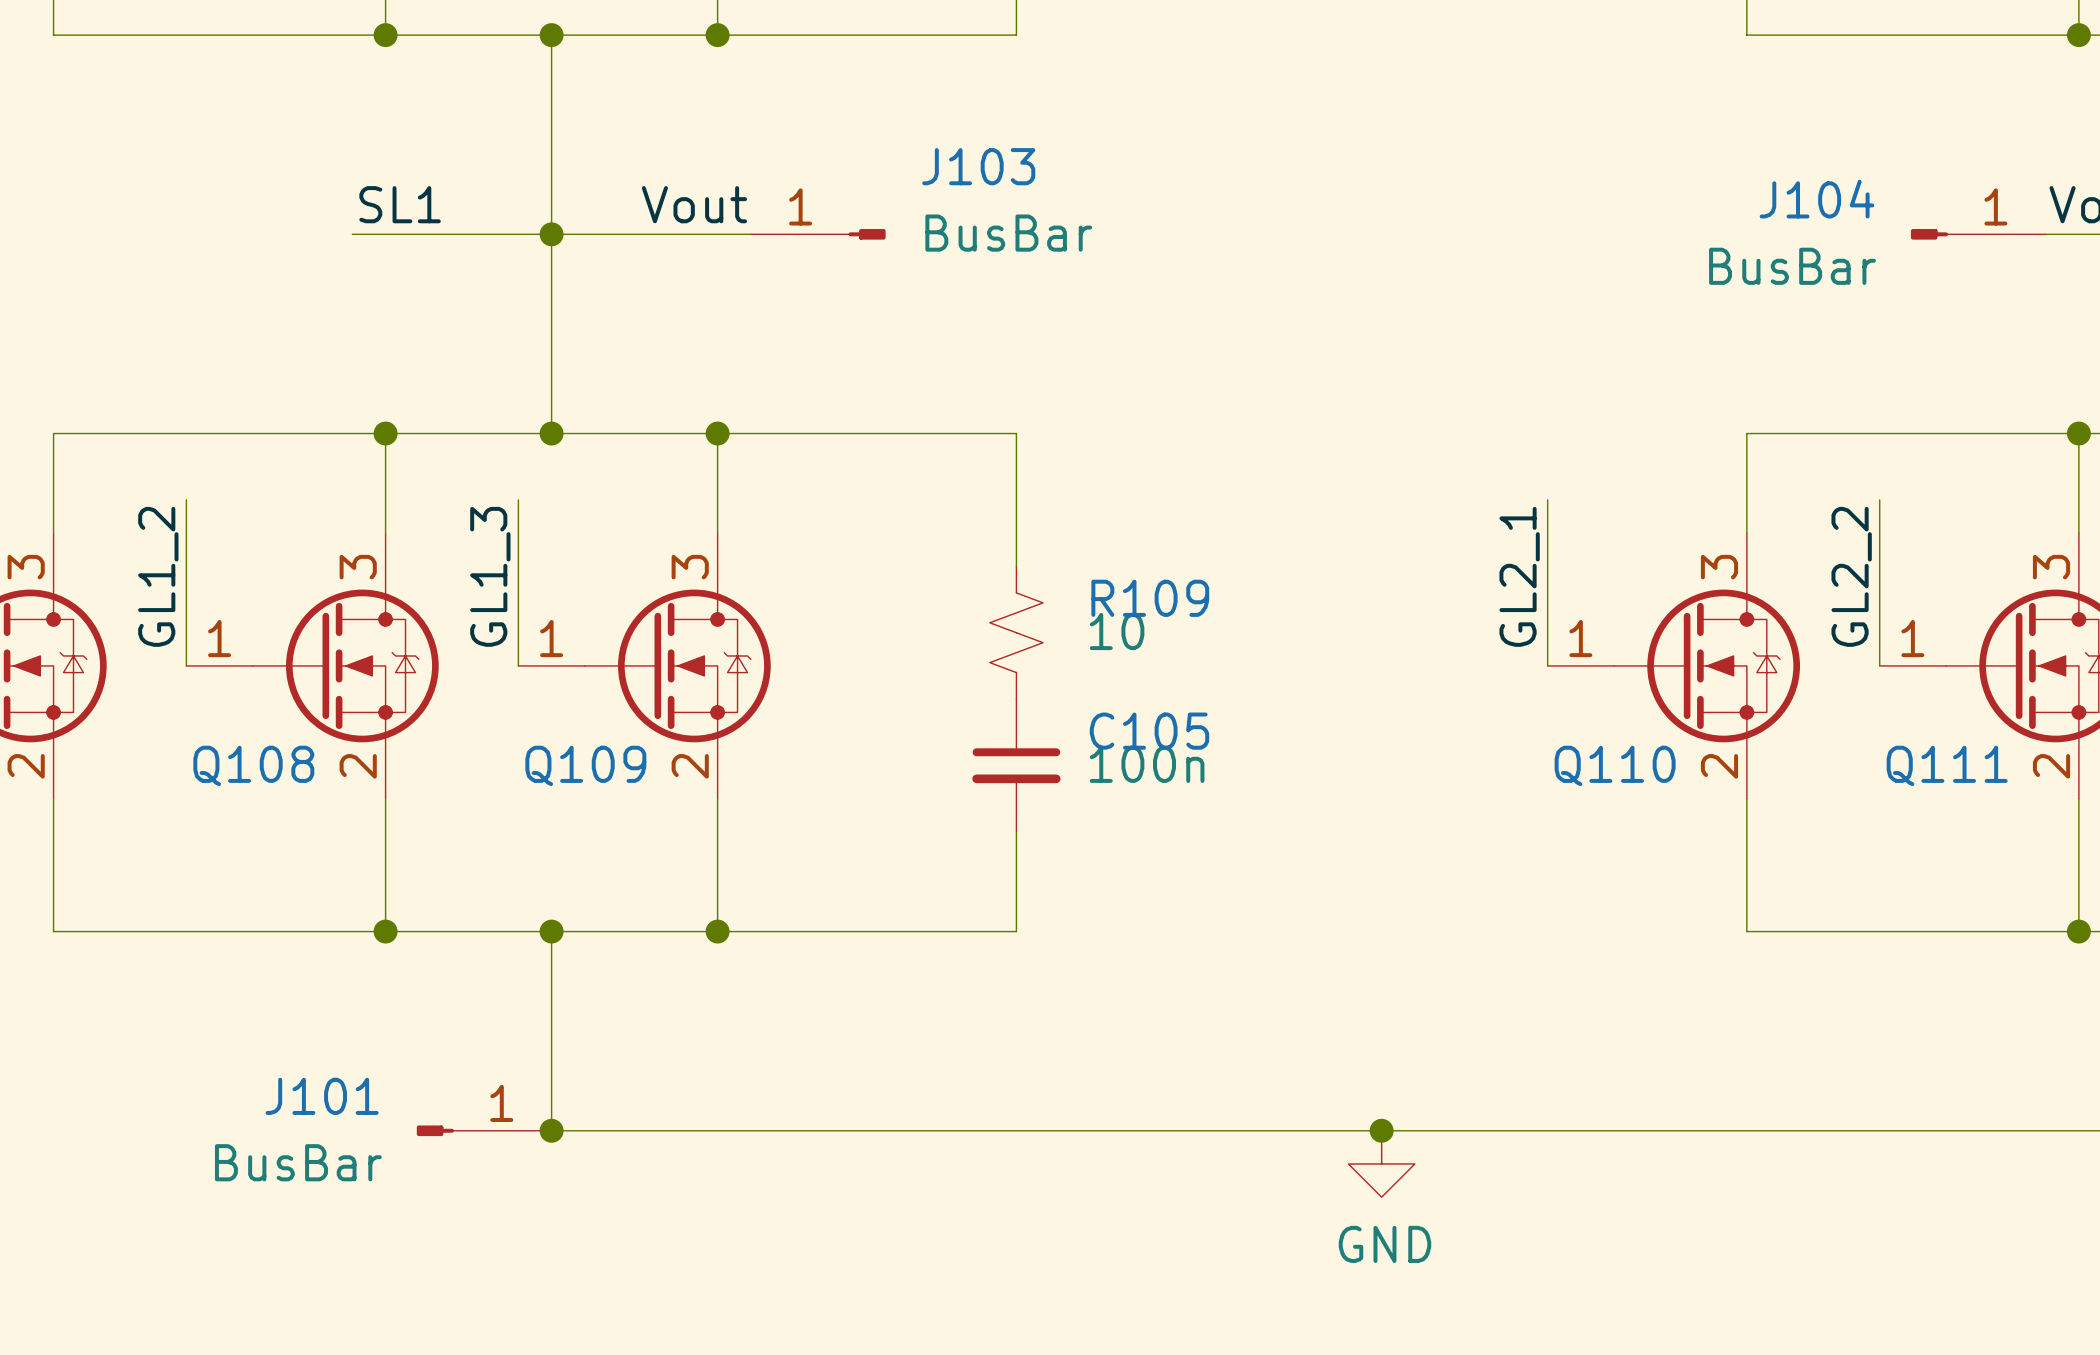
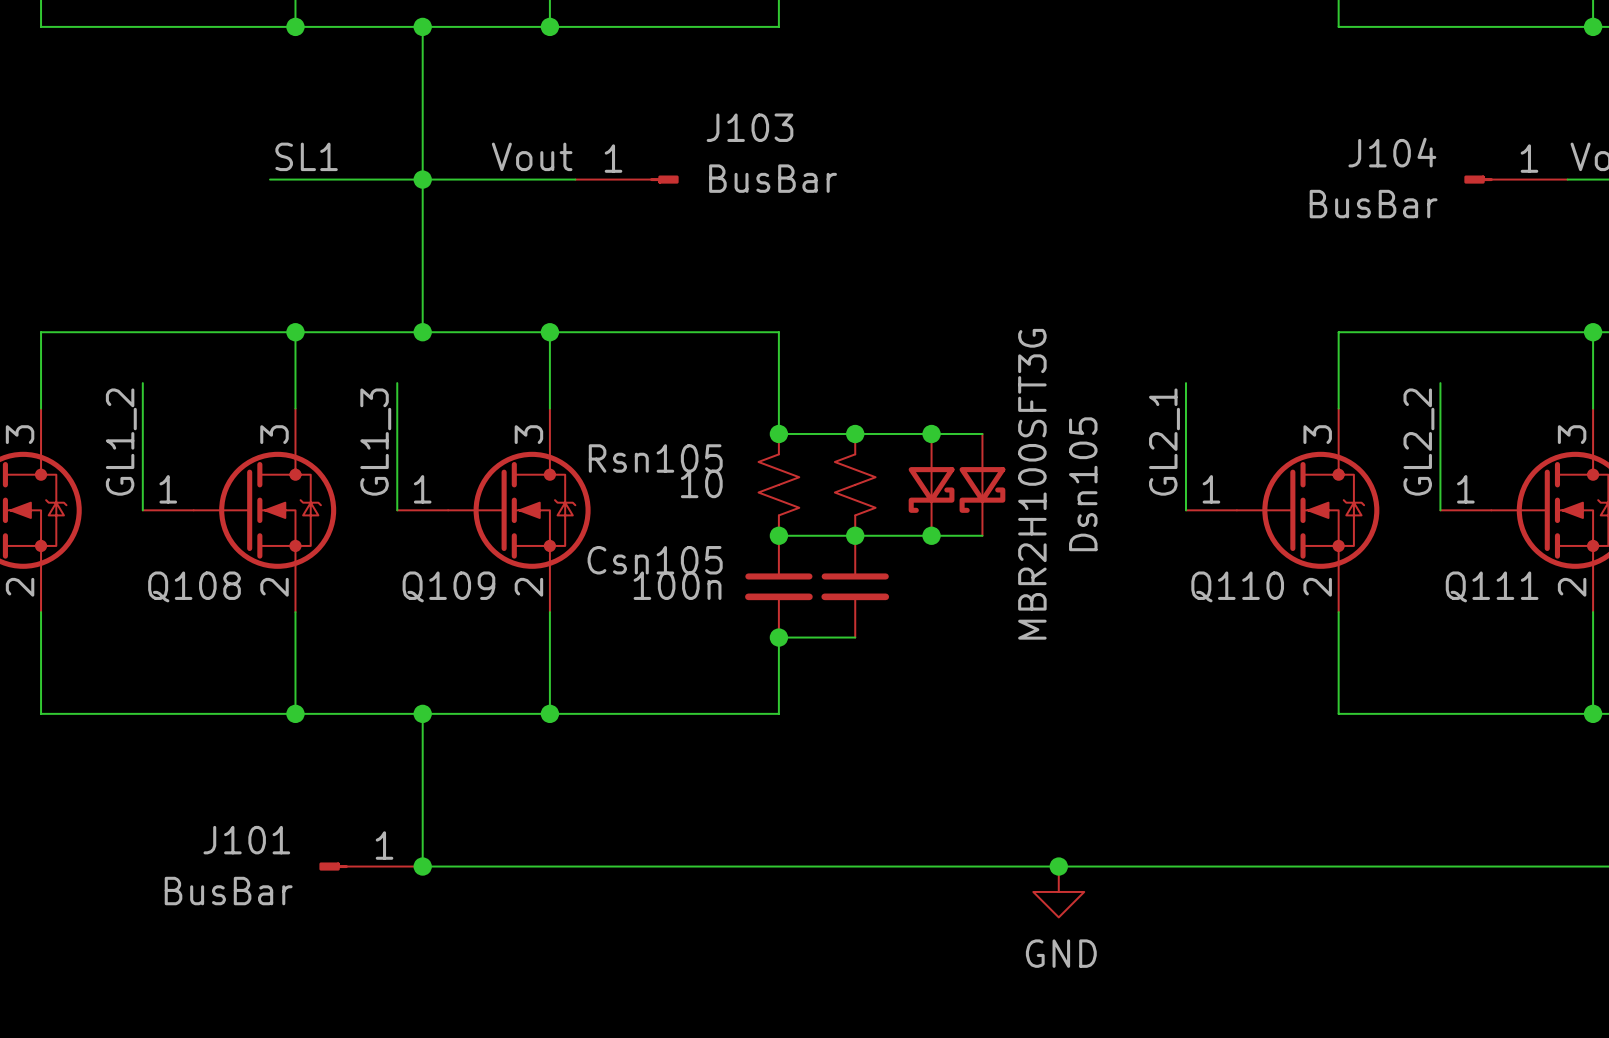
wire: none -> (778, 433) (982, 433)
junction: none -> (778, 433)
junction: none -> (855, 433)
junction: none -> (931, 433)
R109: 10 (1016, 632) -> none
Rsn105: none -> 10 (778, 484)
part: none -> (855, 484)
Dsn105: none -> MBR2H100SFT3G (931, 484)
part: none -> (982, 484)
wire: none -> (778, 535) (982, 535)
junction: none -> (778, 535)
junction: none -> (855, 535)
junction: none -> (931, 535)
C105 name: C105 (1149, 731) -> Csn105 (655, 560)
C105 value position: 100n (1147, 764) -> 100n (677, 585)
part: none -> (855, 586)
wire: none -> (778, 637) (855, 637)
junction: none -> (778, 637)

